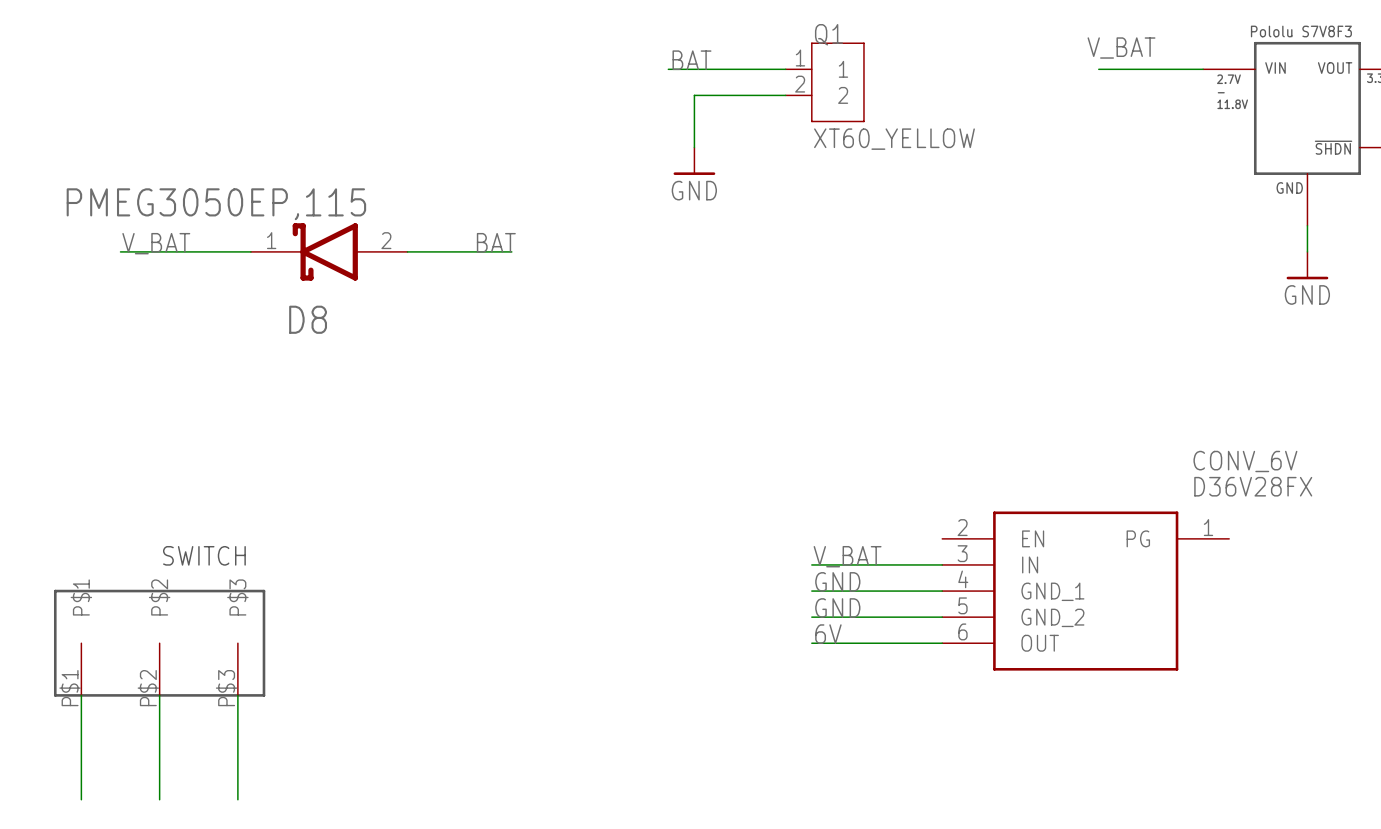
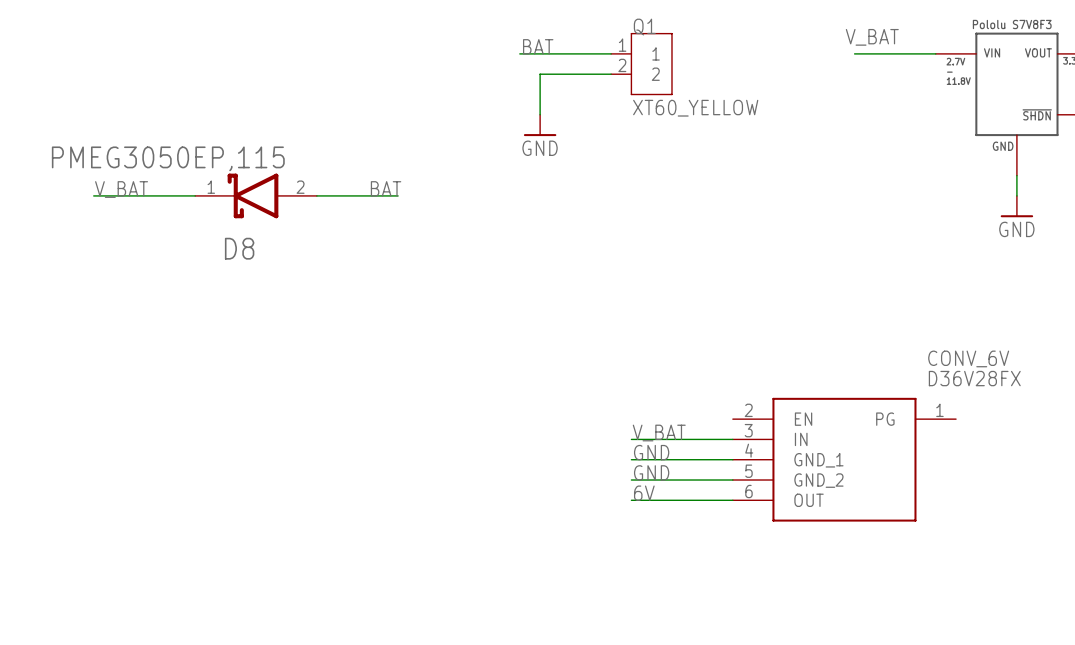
part: (159, 643) -> none
wire: (81, 695) (81, 799) -> none
wire: (159, 695) (159, 799) -> none
wire: (237, 695) (237, 799) -> none

